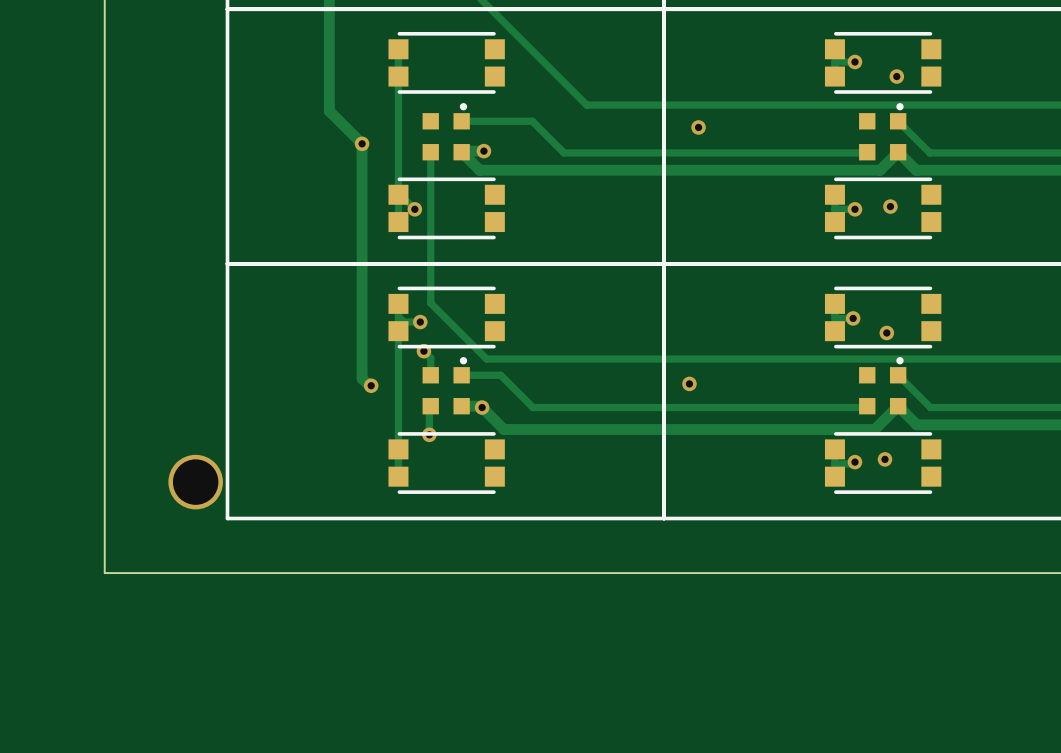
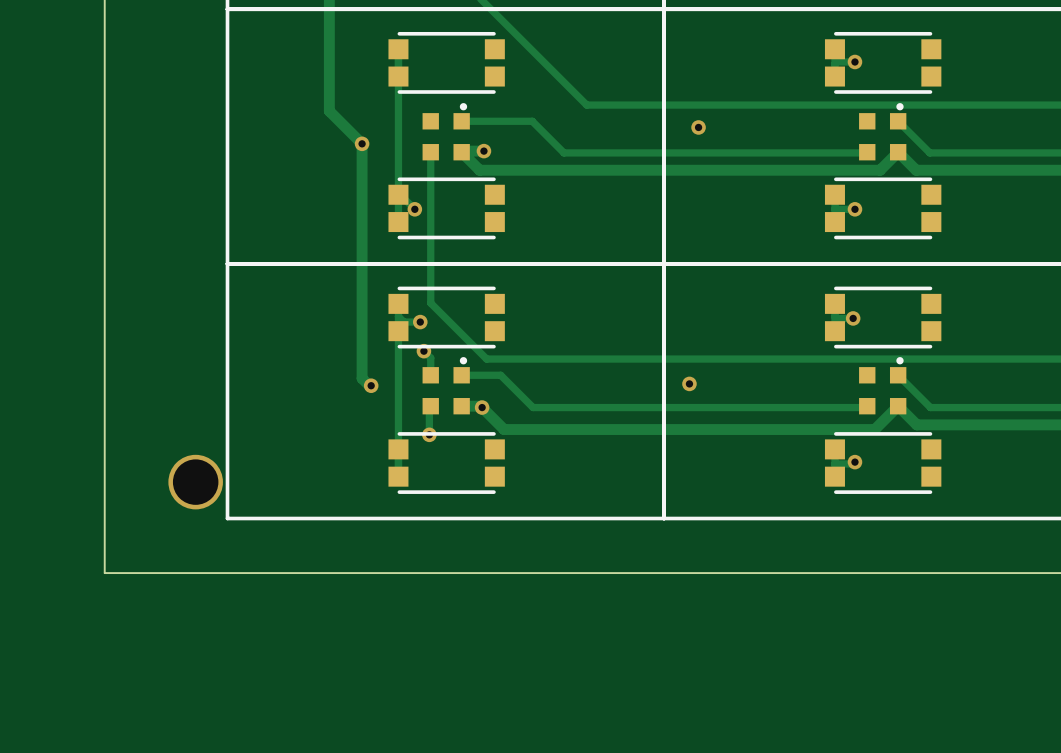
via: (896, 76) -> none
via: (890, 206) -> none
via: (886, 332) -> none
via: (884, 459) -> none

